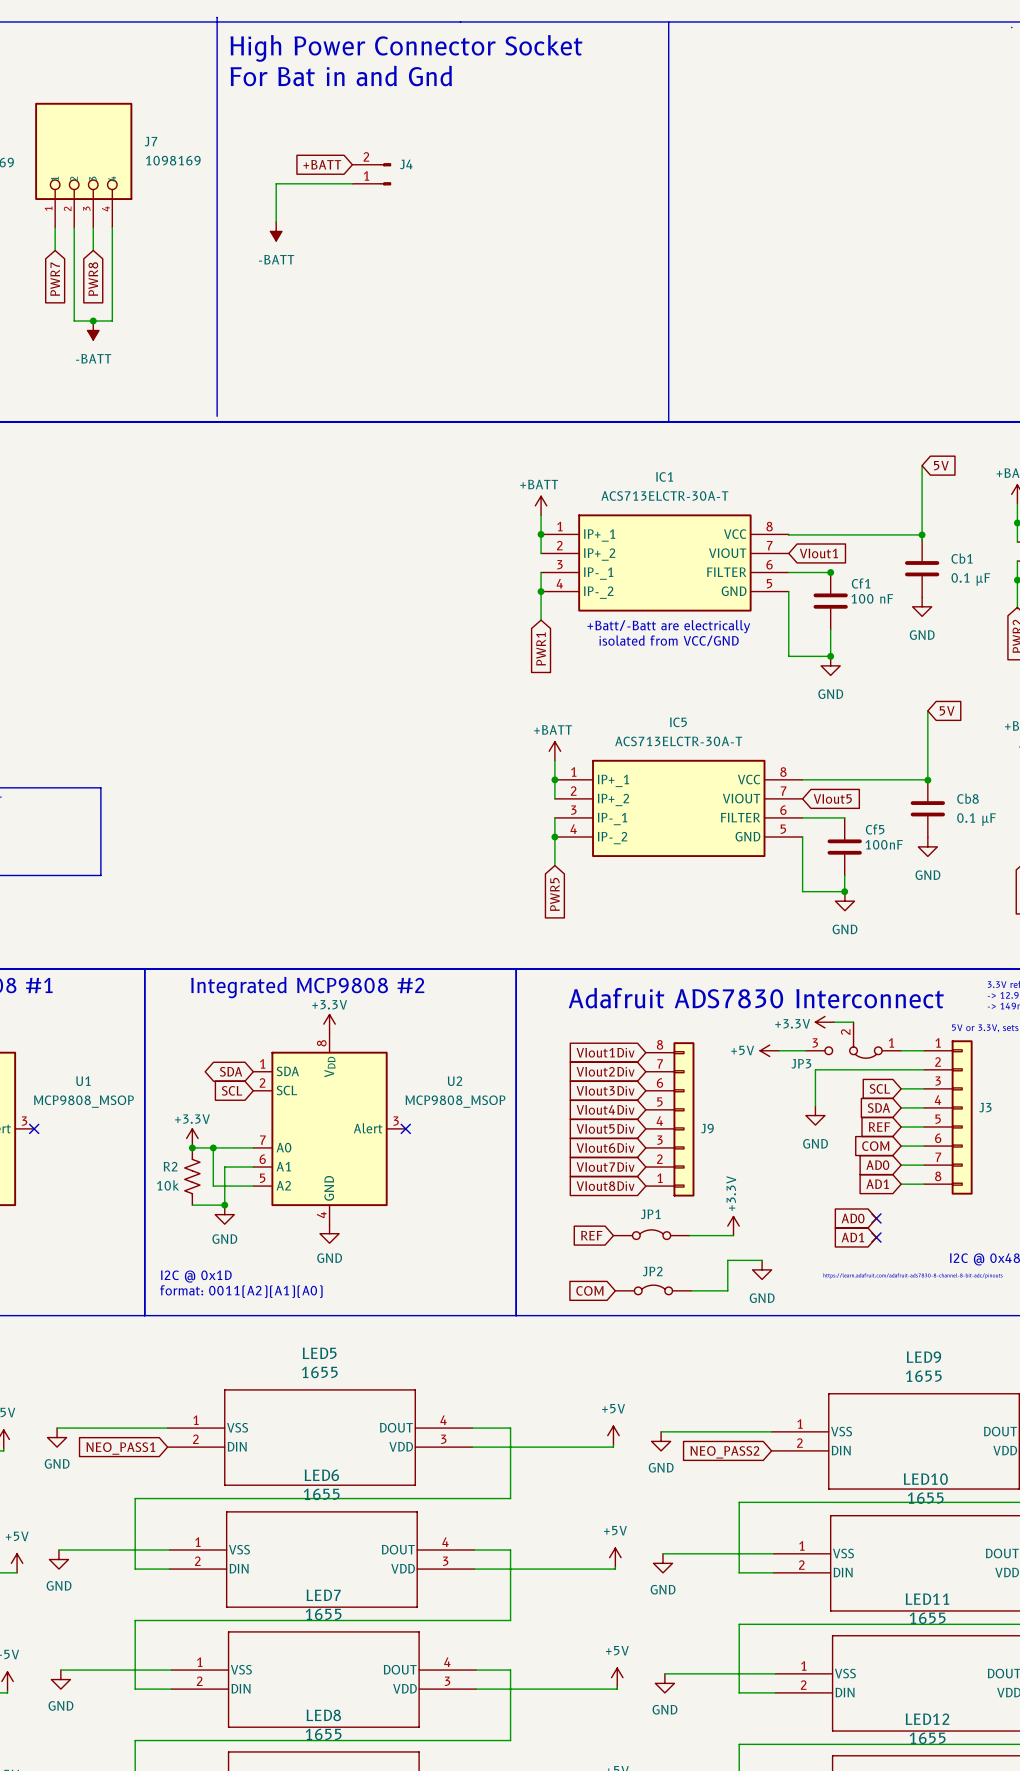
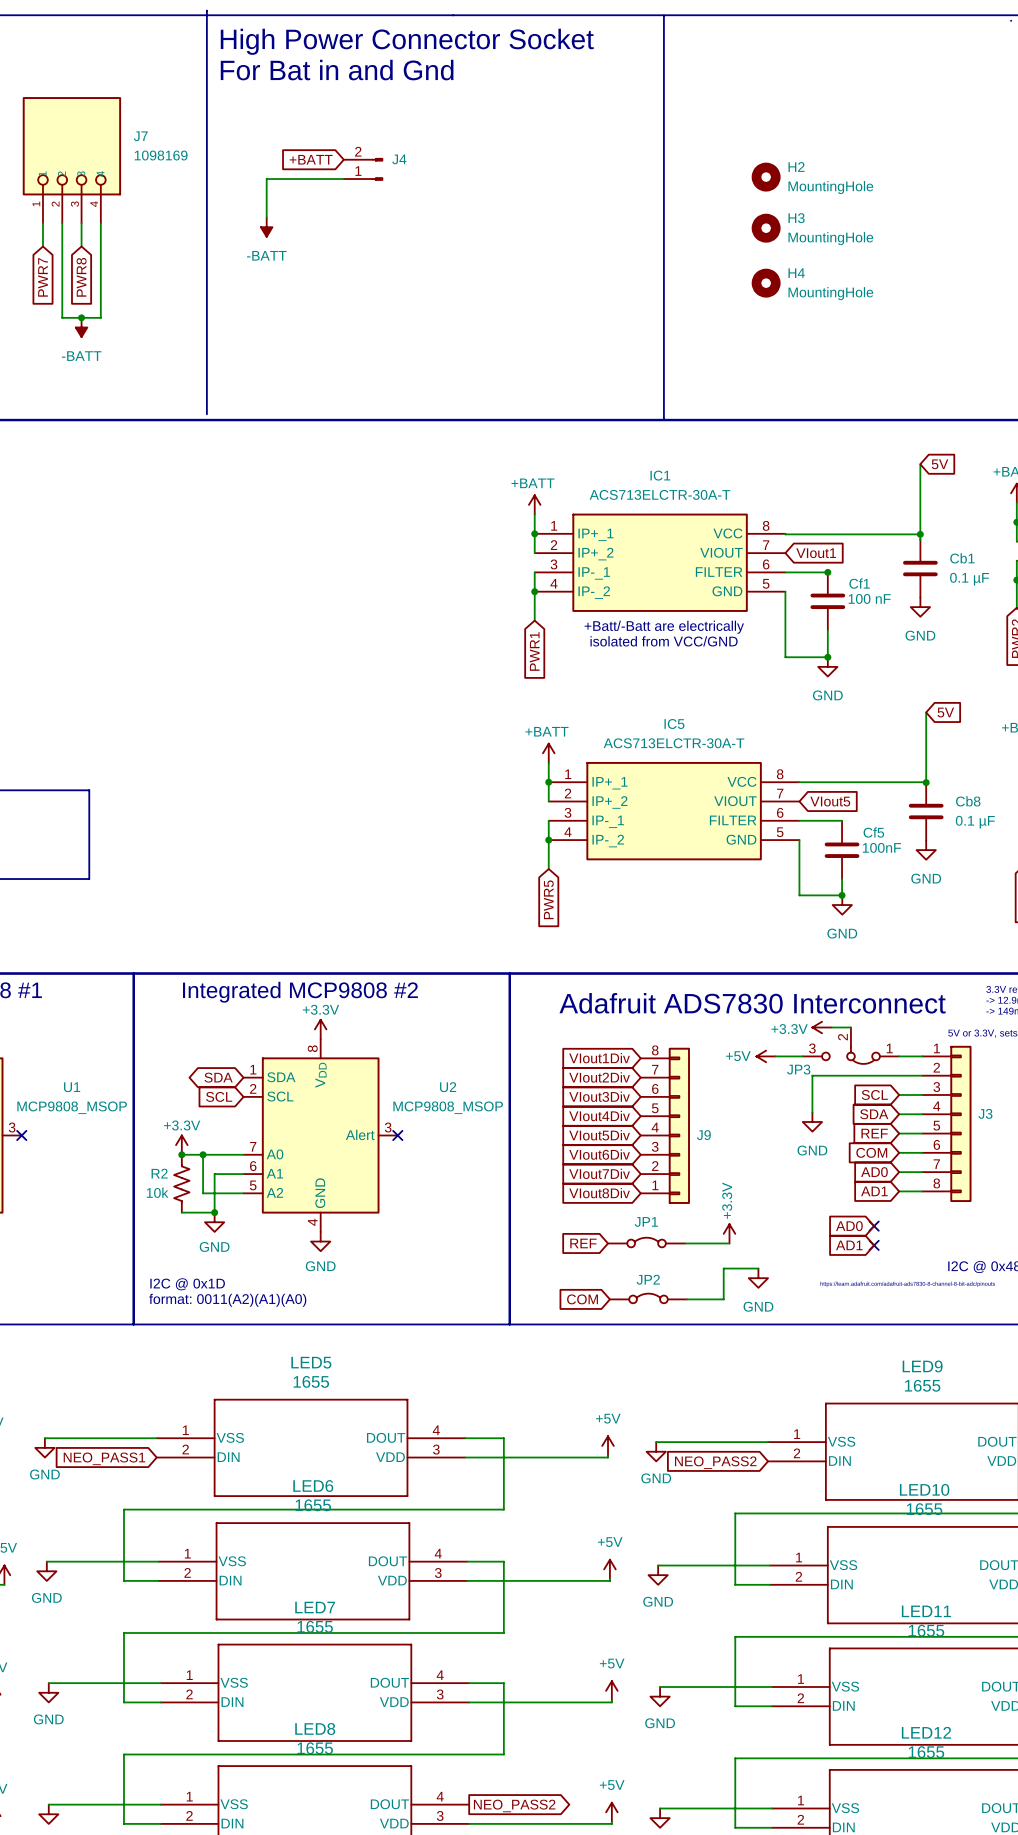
H2: none -> MountingHole (766, 177)
H3: none -> MountingHole (766, 228)
H4: none -> MountingHole (766, 283)

